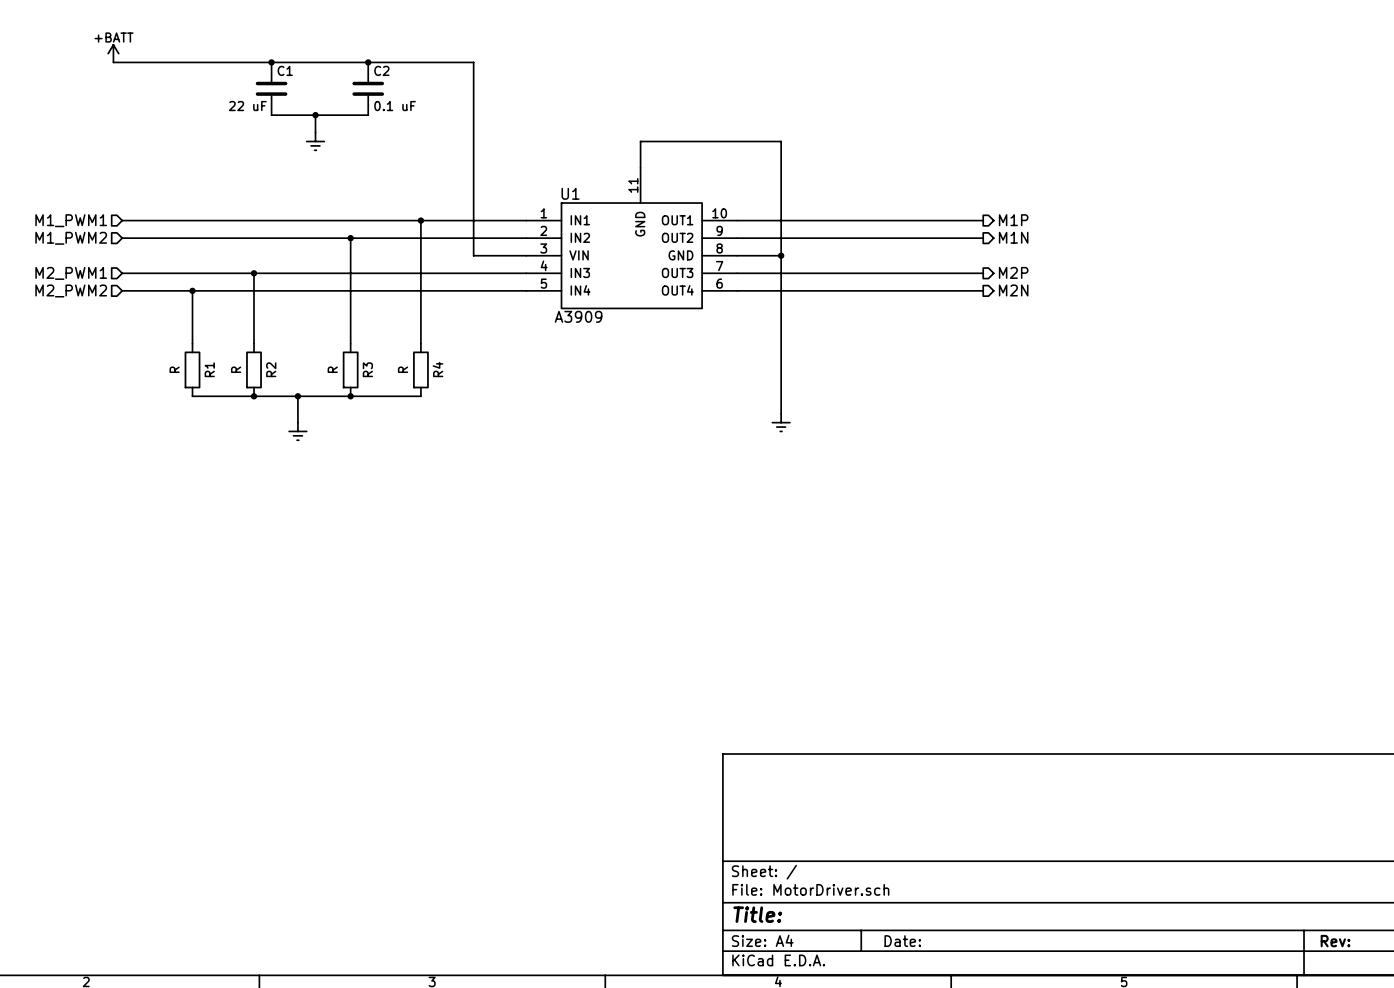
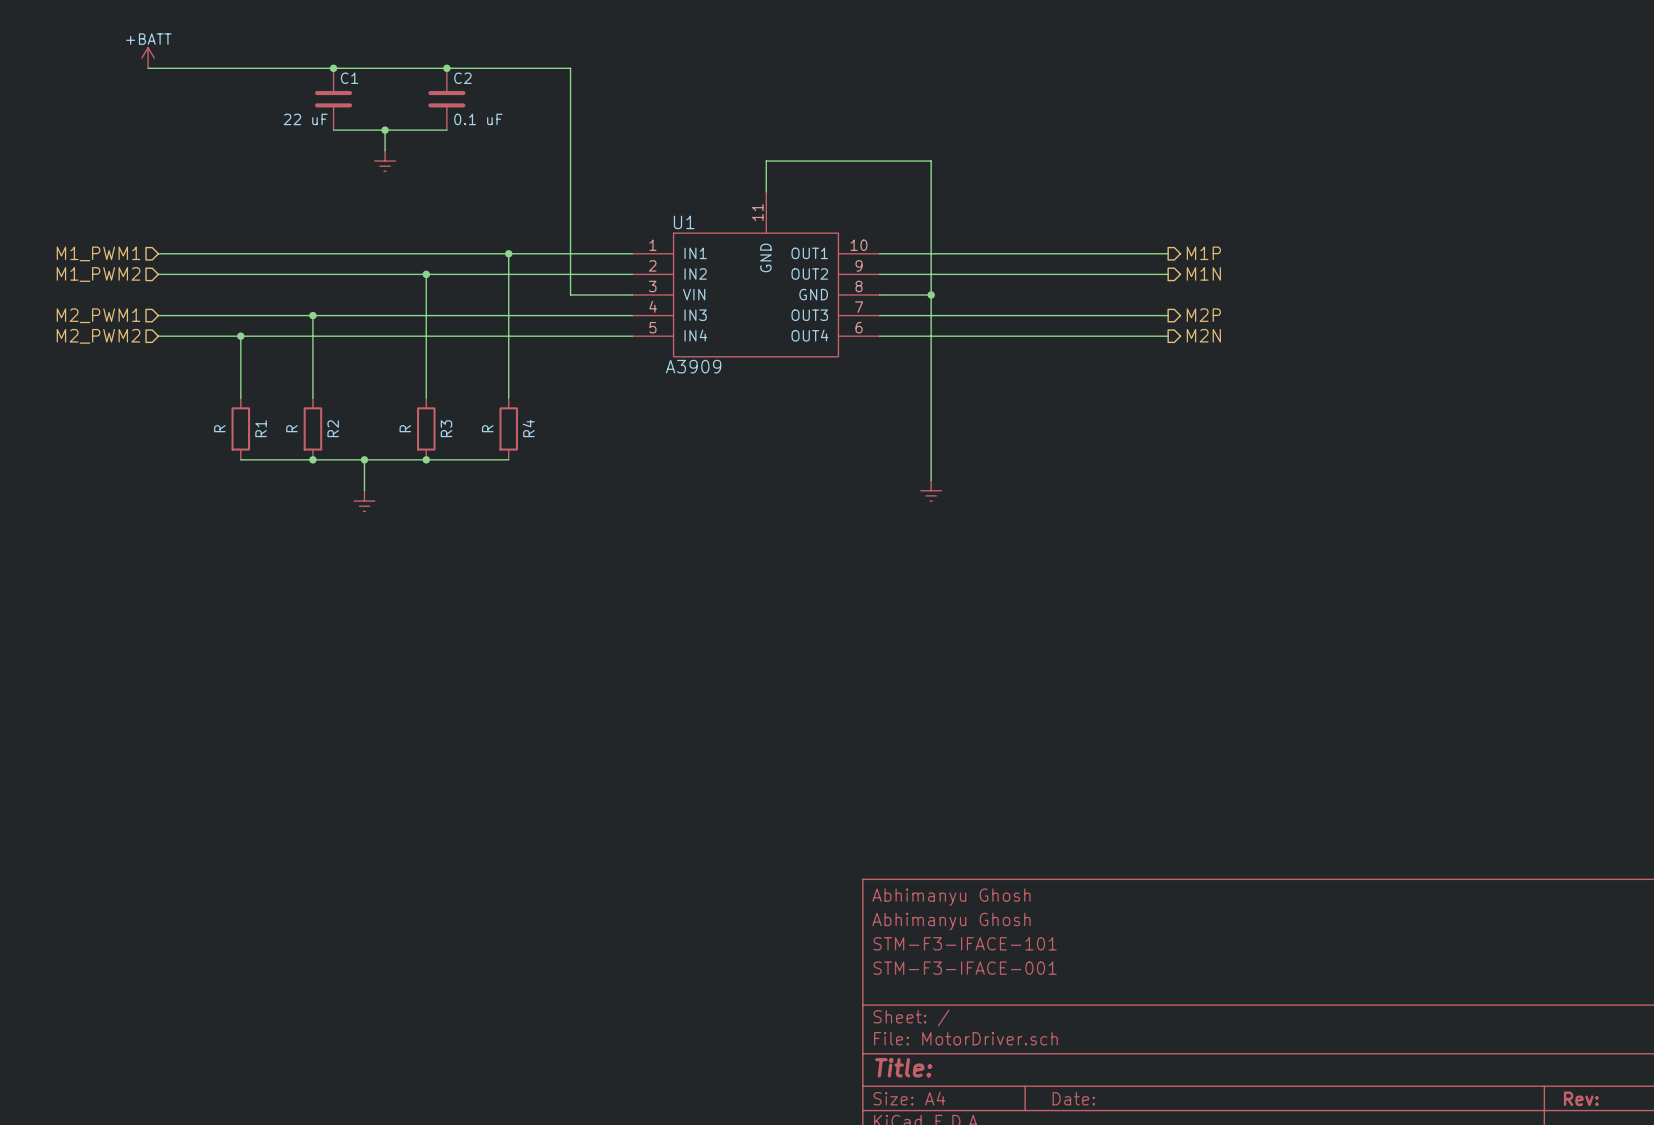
title block: none -> Abhimanyu Ghosh (951, 897)
title block: none -> Abhimanyu Ghosh (951, 921)
title block: none -> STM-F3-IFACE-101 (965, 943)
title block: none -> STM-F3-IFACE-001 (965, 968)

